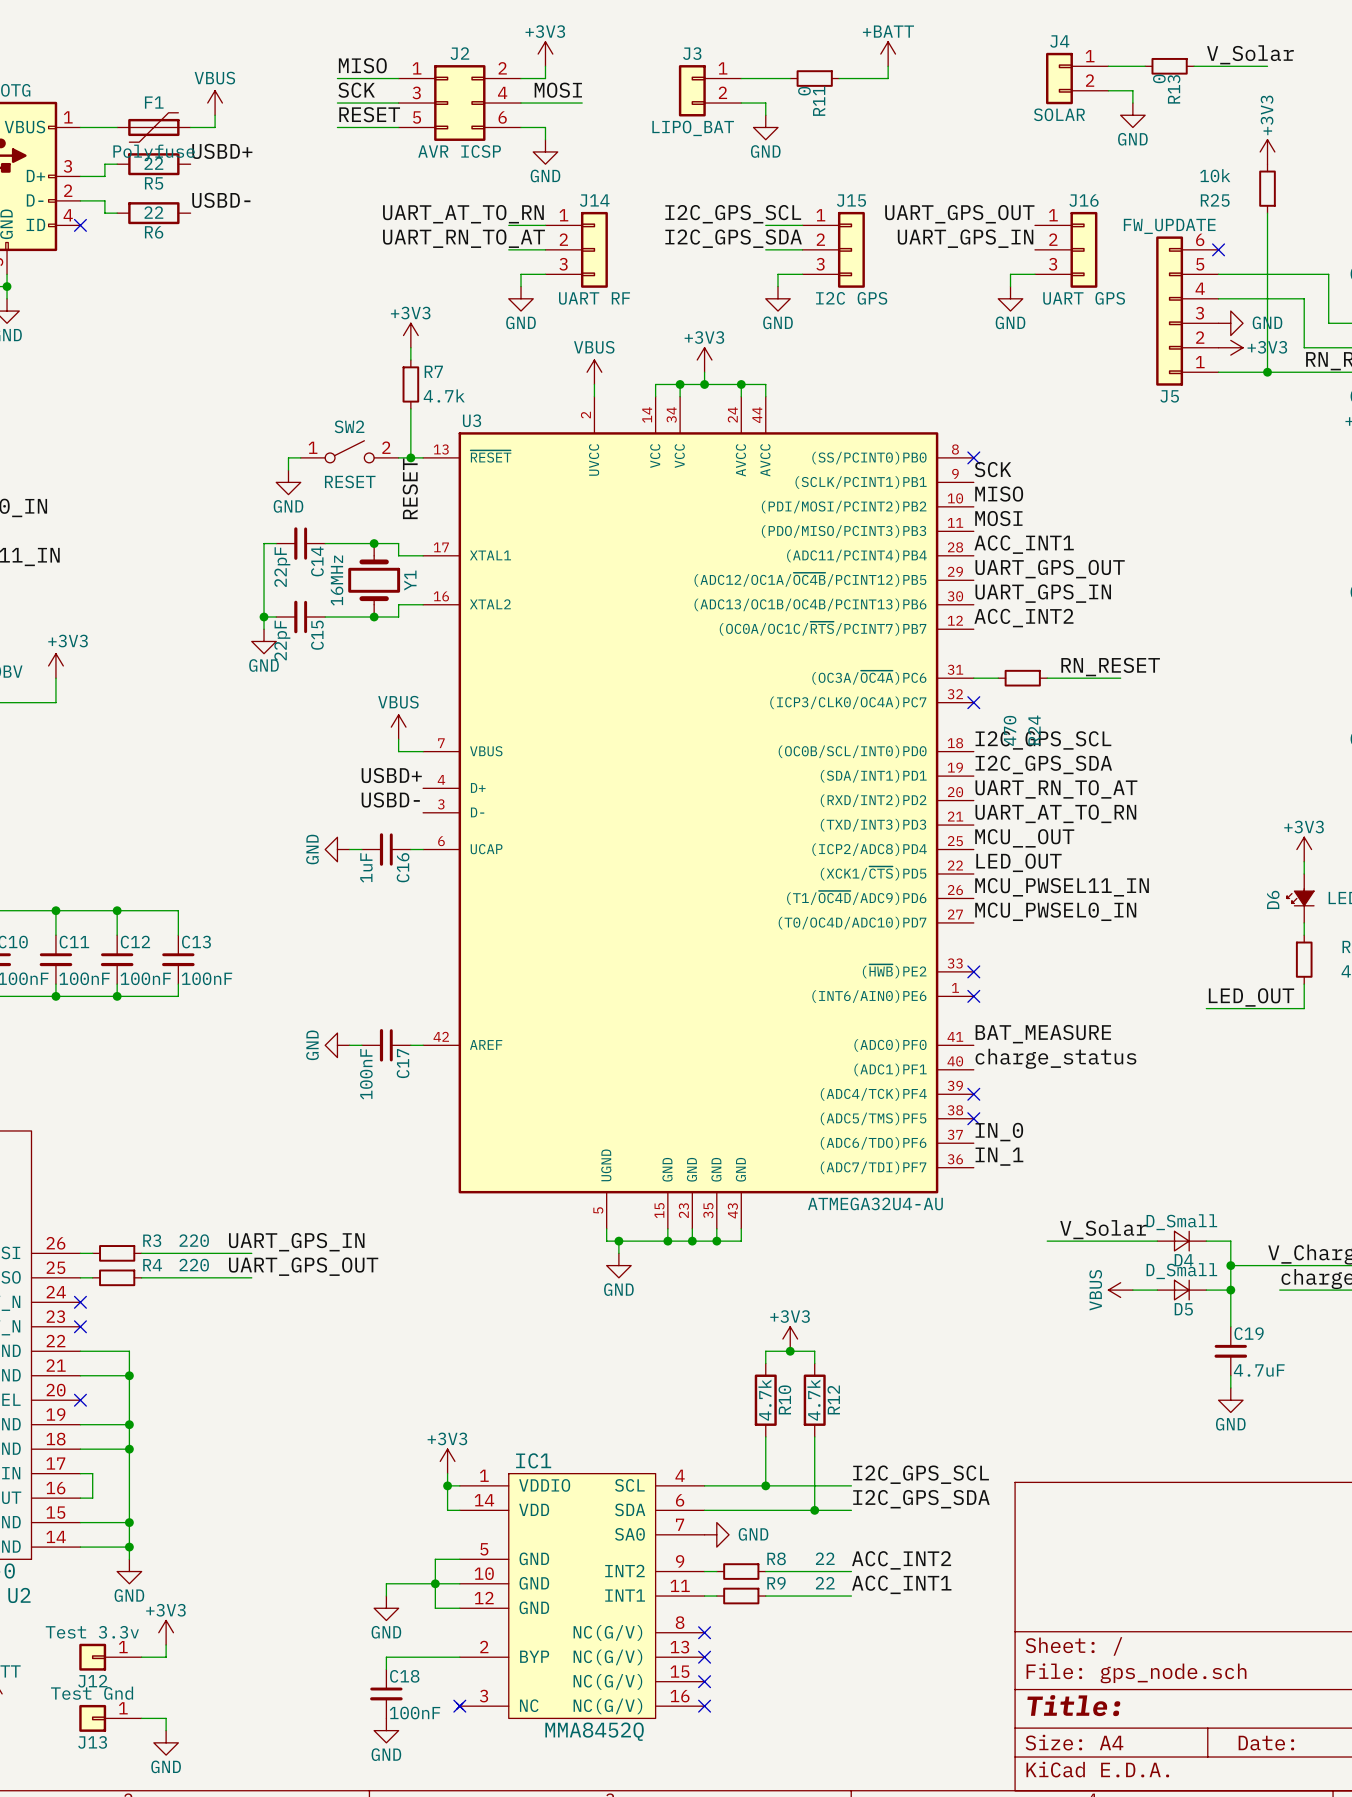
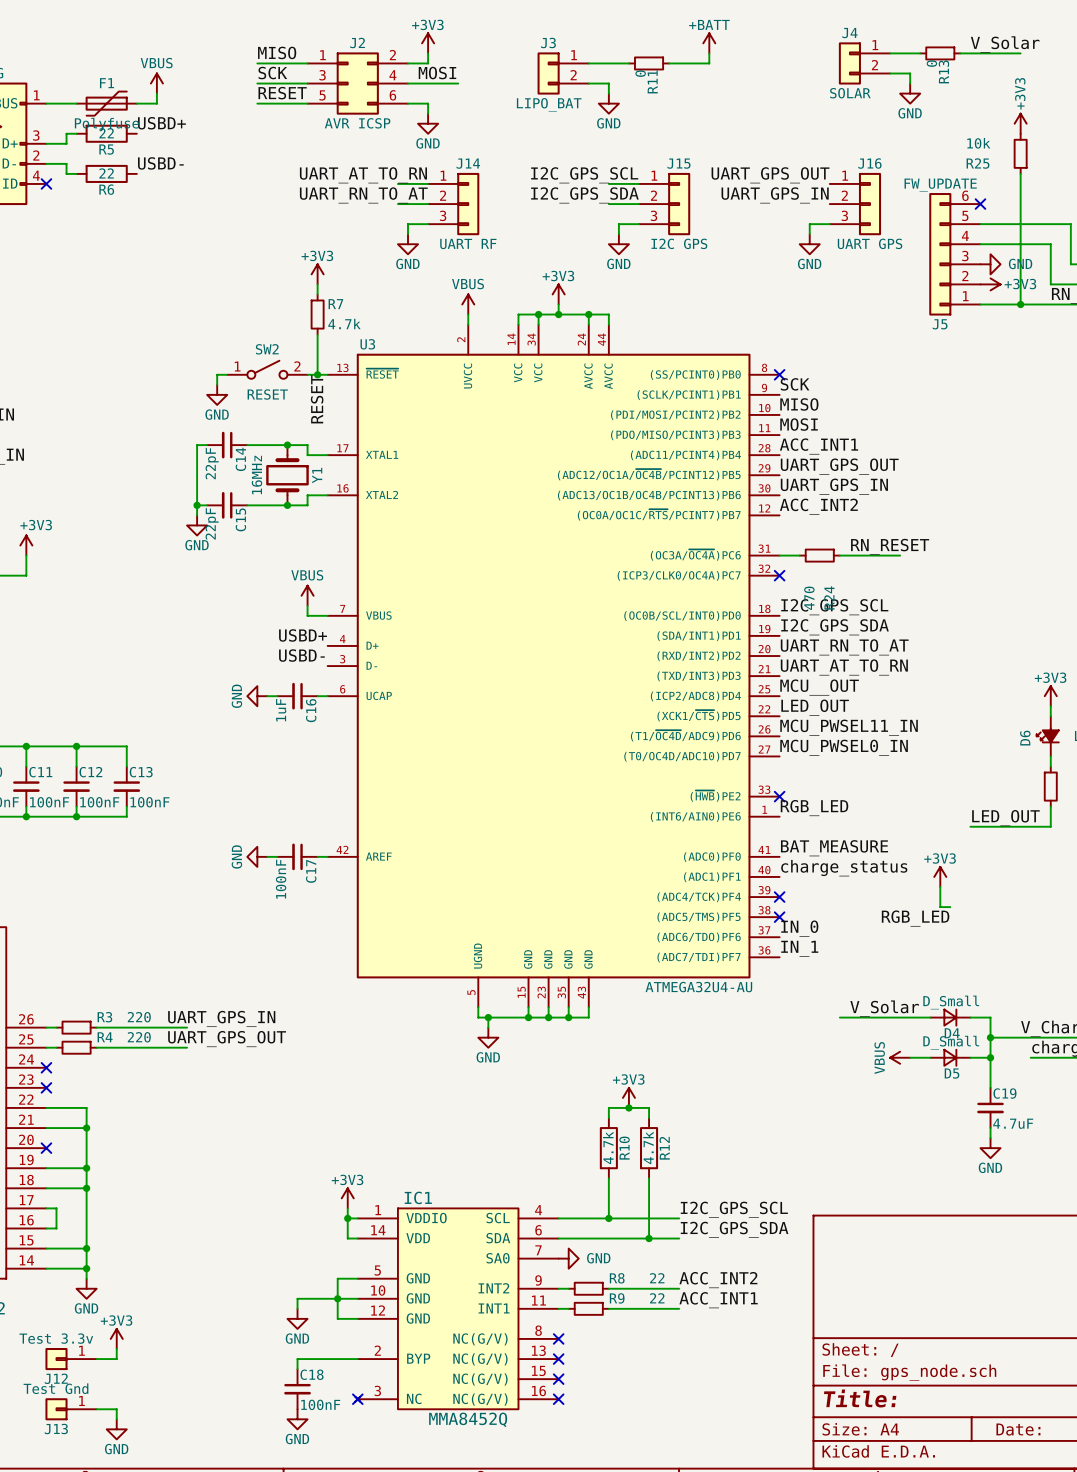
label: none -> RGB_LED (814, 808)
no-connect mark: (973, 996) -> none
power symbol: none -> +3V3 (940, 876)
wire: none -> (940, 887) (940, 907) (950, 907)
label: none -> RGB_LED (915, 918)

